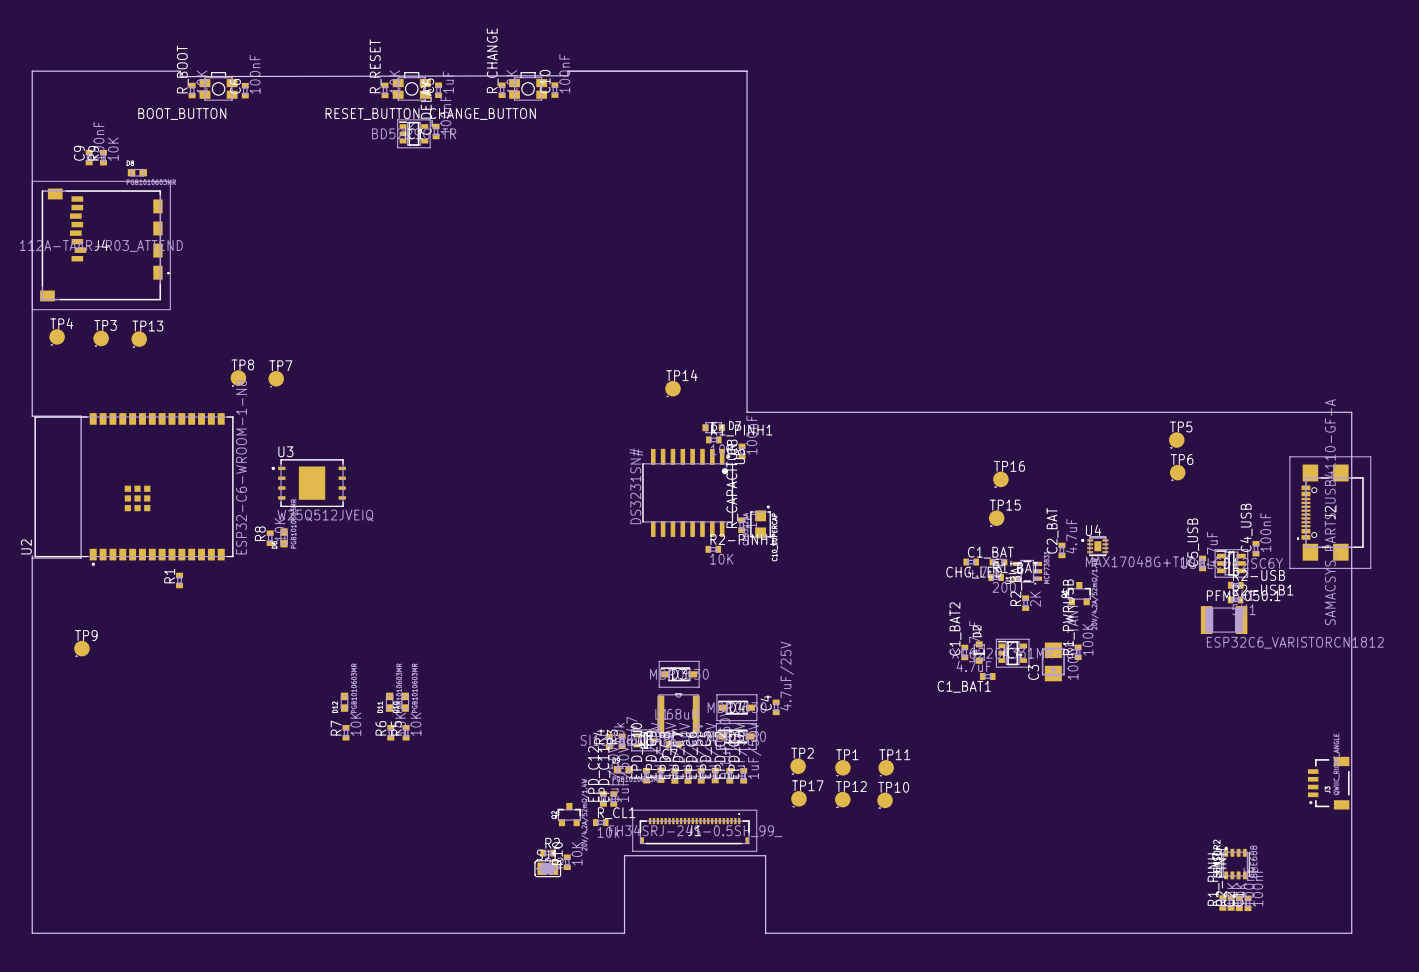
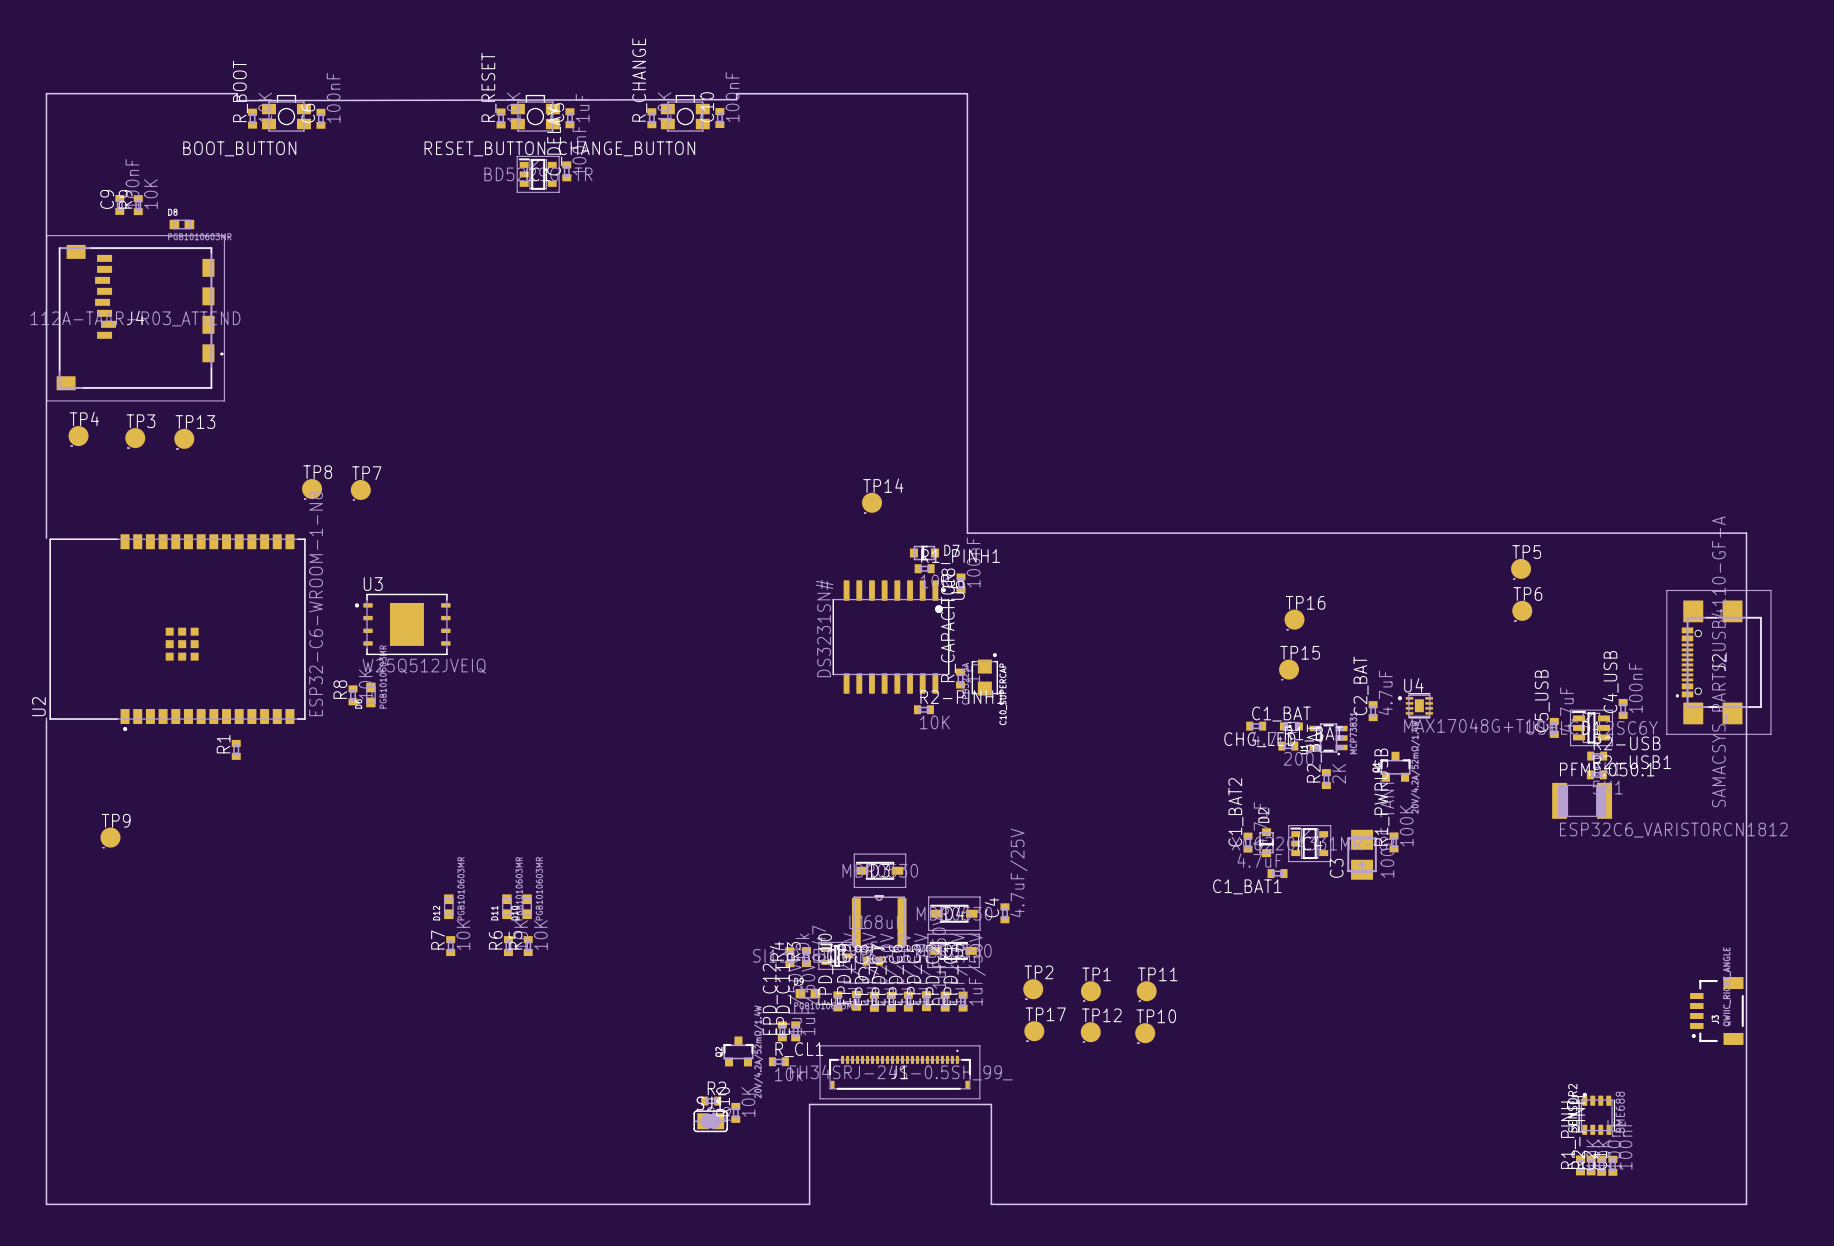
board edge: (32, 416) (81, 416) (81, 558) (32, 558) -> none

